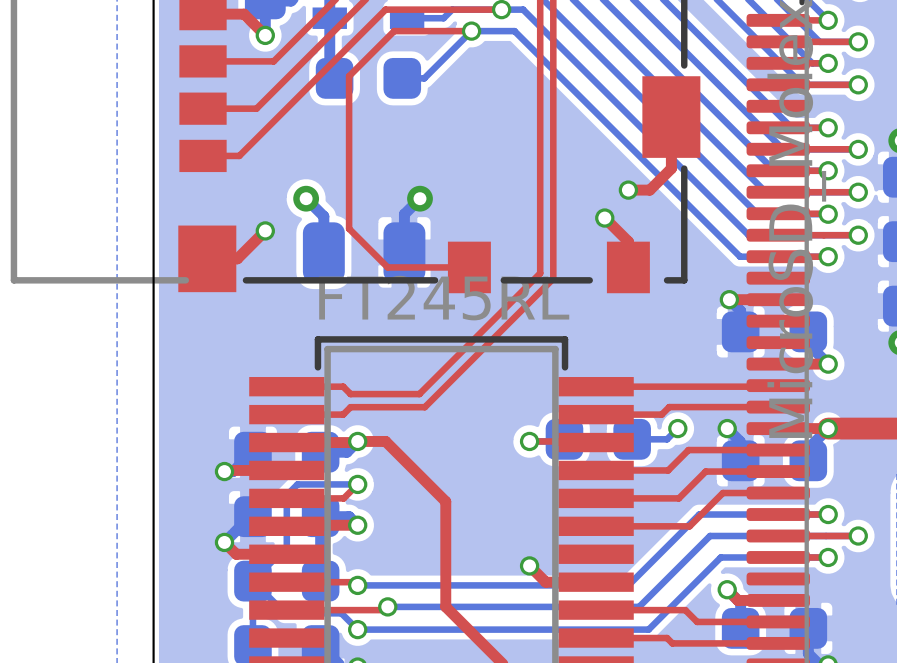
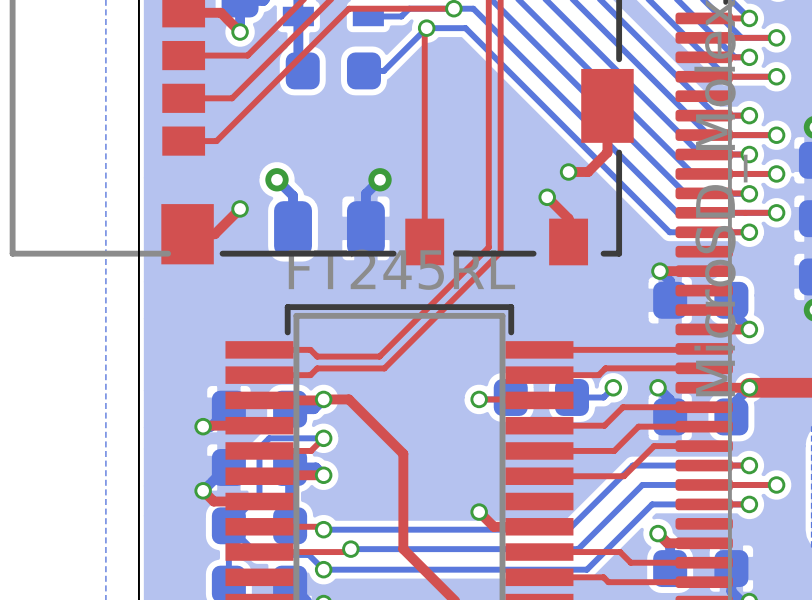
top track: (471, 31) (394, 31) (349, 76) (349, 228) (387, 267) (469, 267) -> (424, 30) (424, 241)

